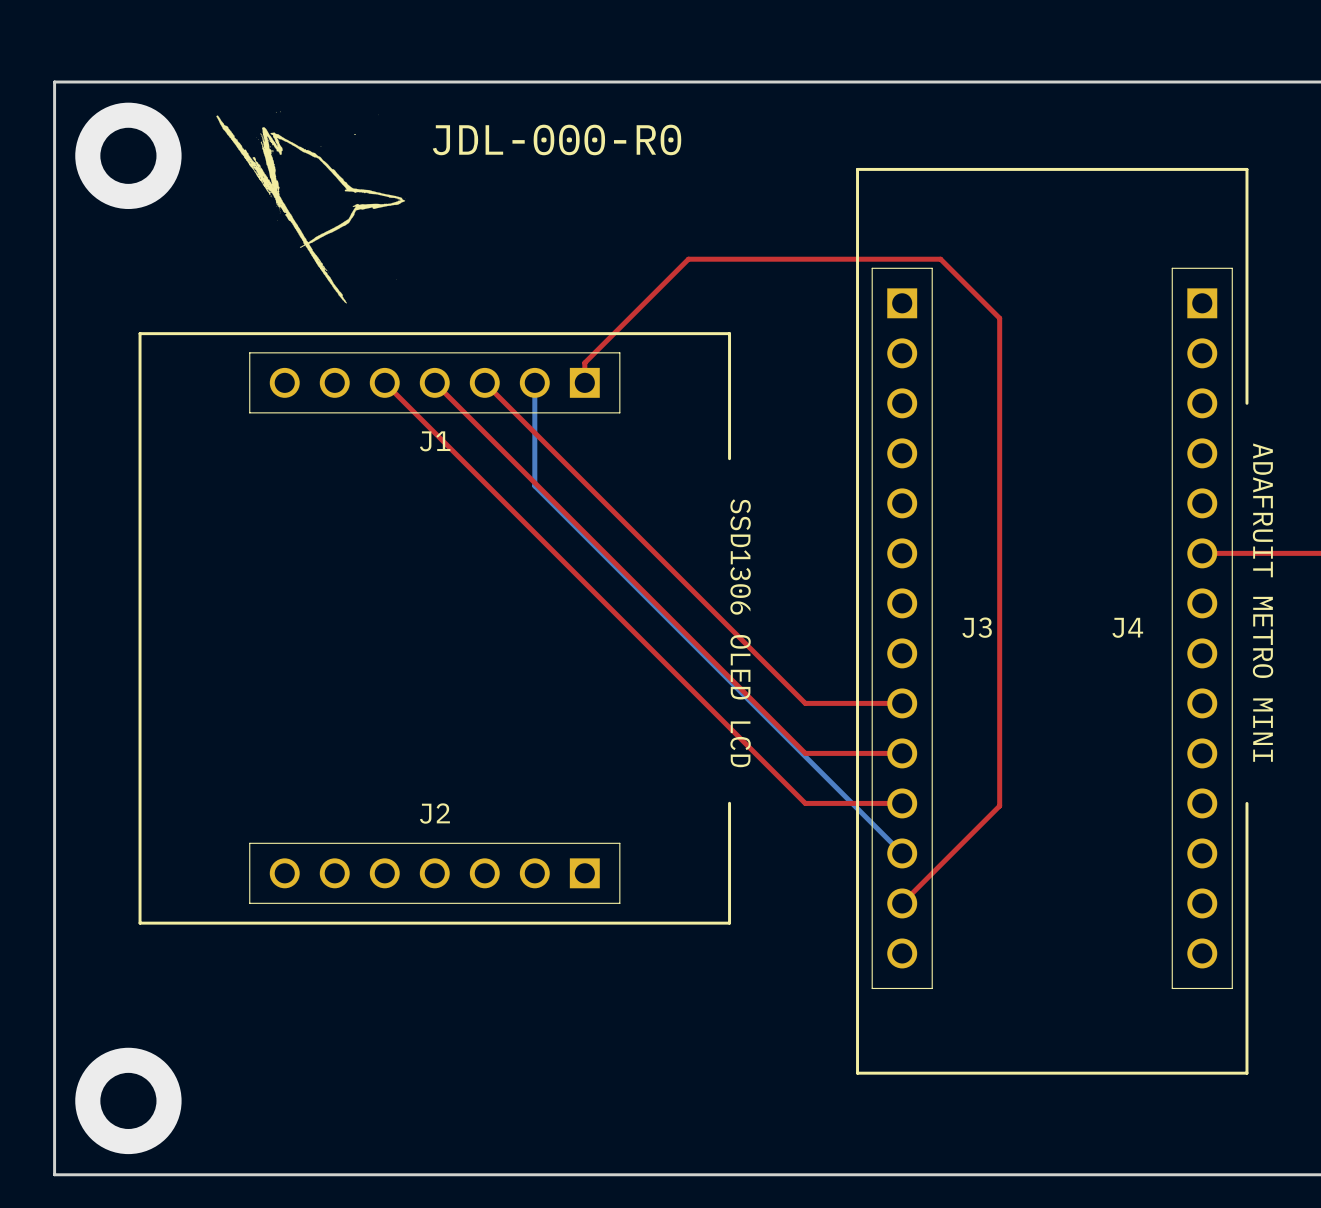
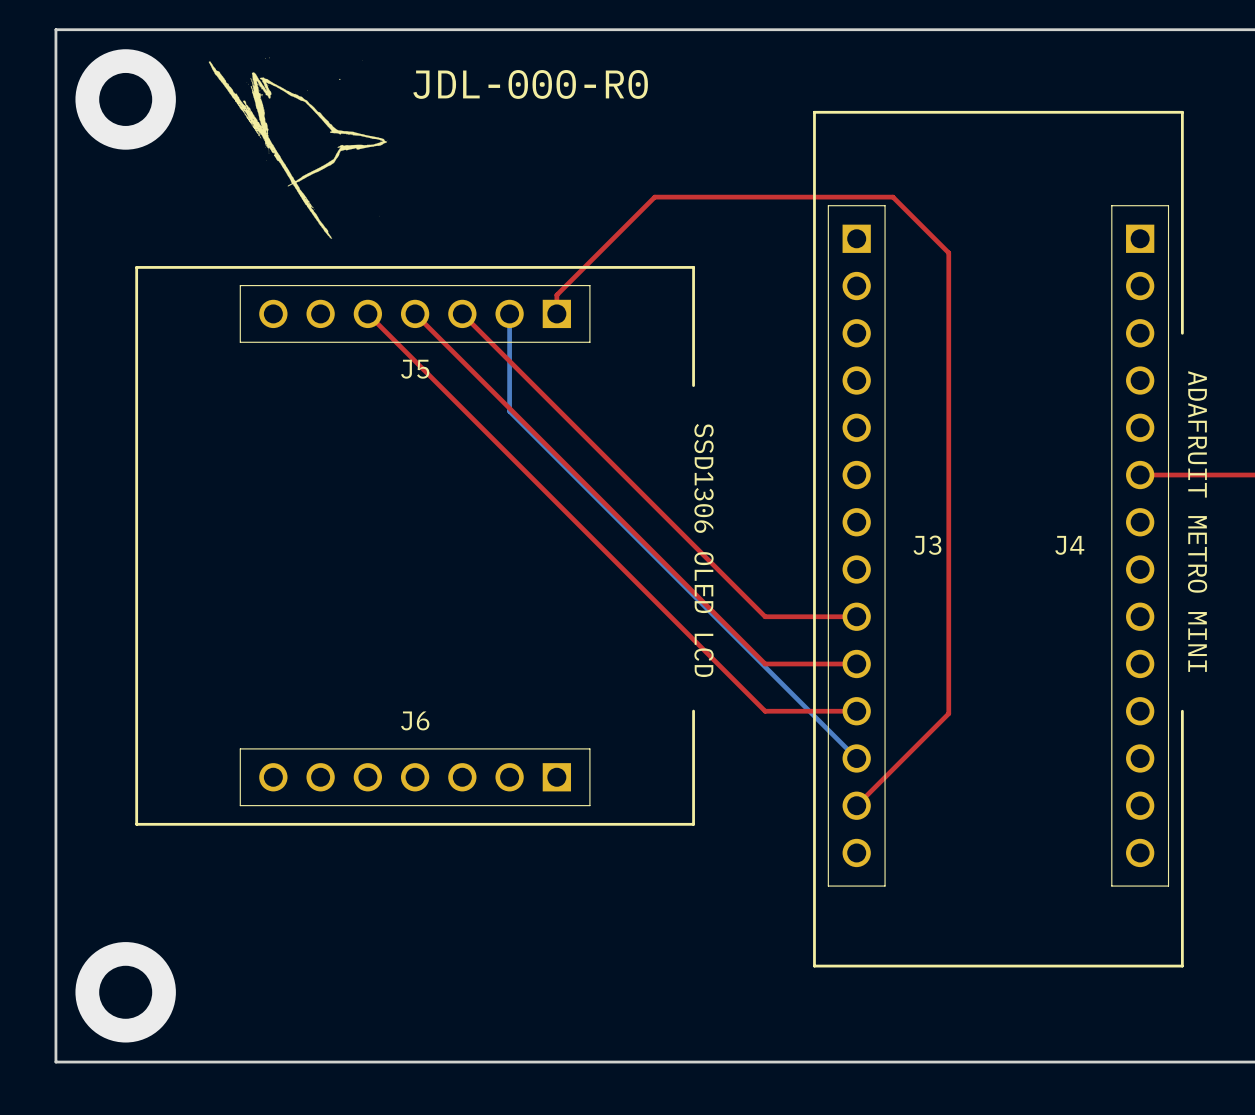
J1 name: J1 (435, 441) -> J5 (415, 369)
J2 name: J2 (434, 813) -> J6 (415, 720)

